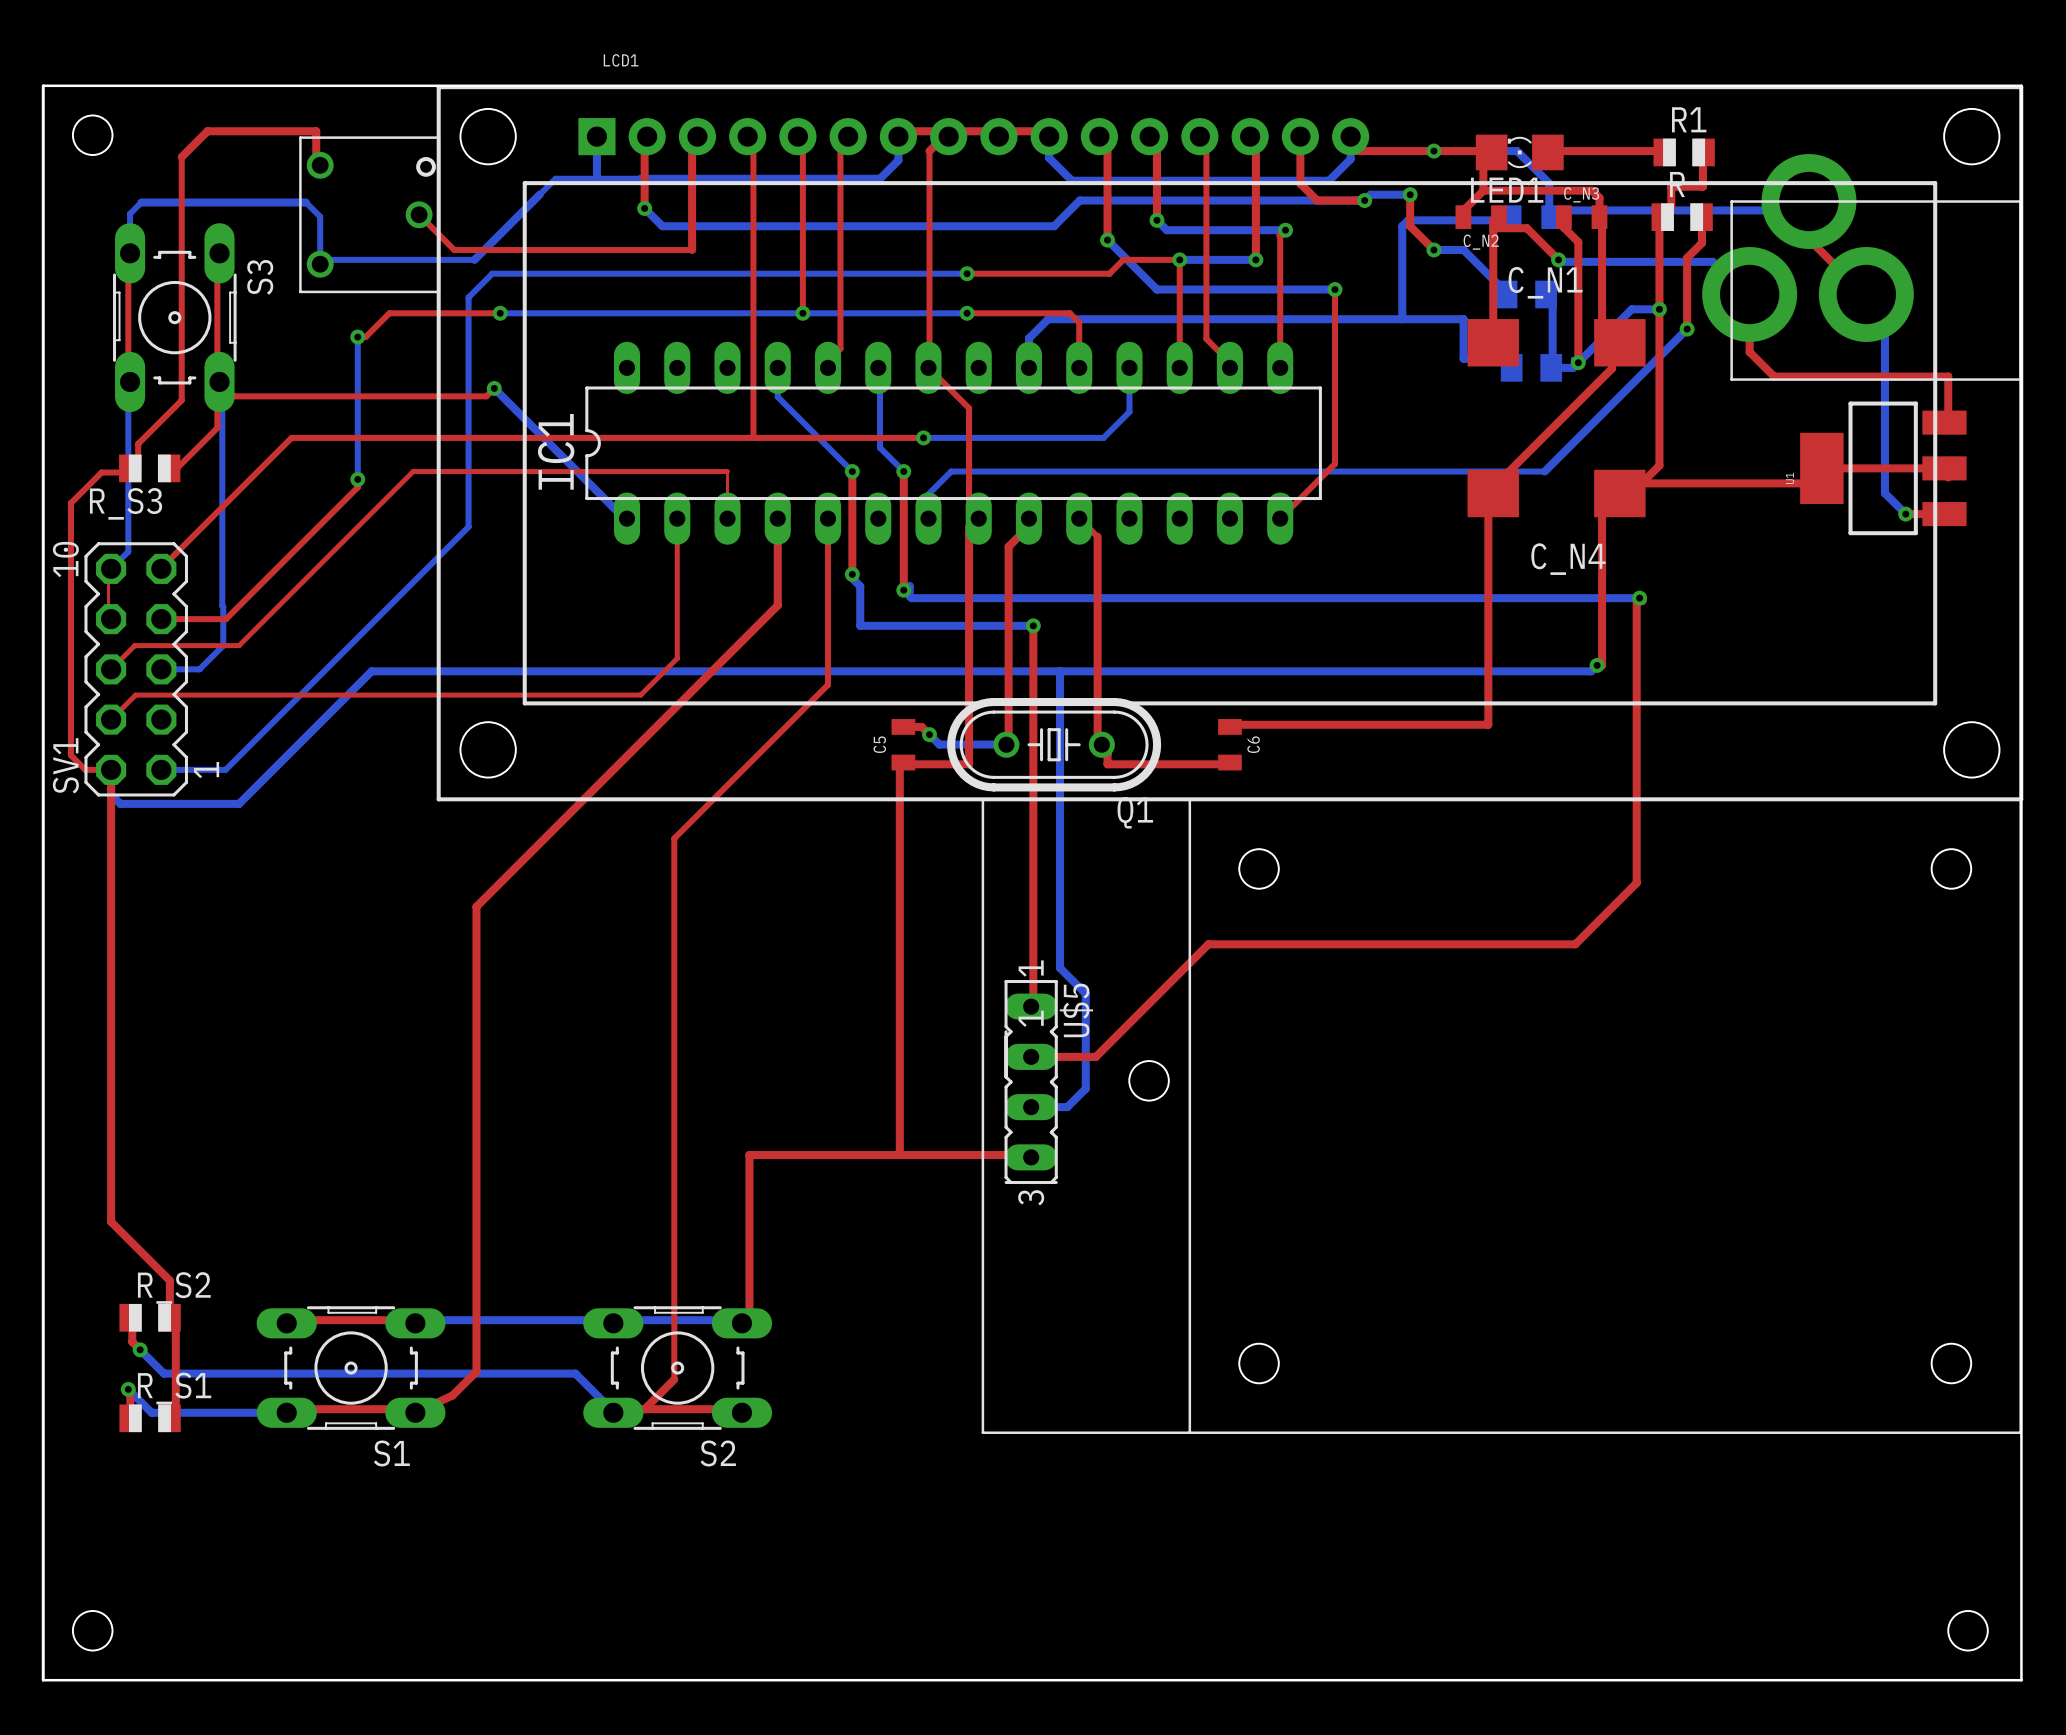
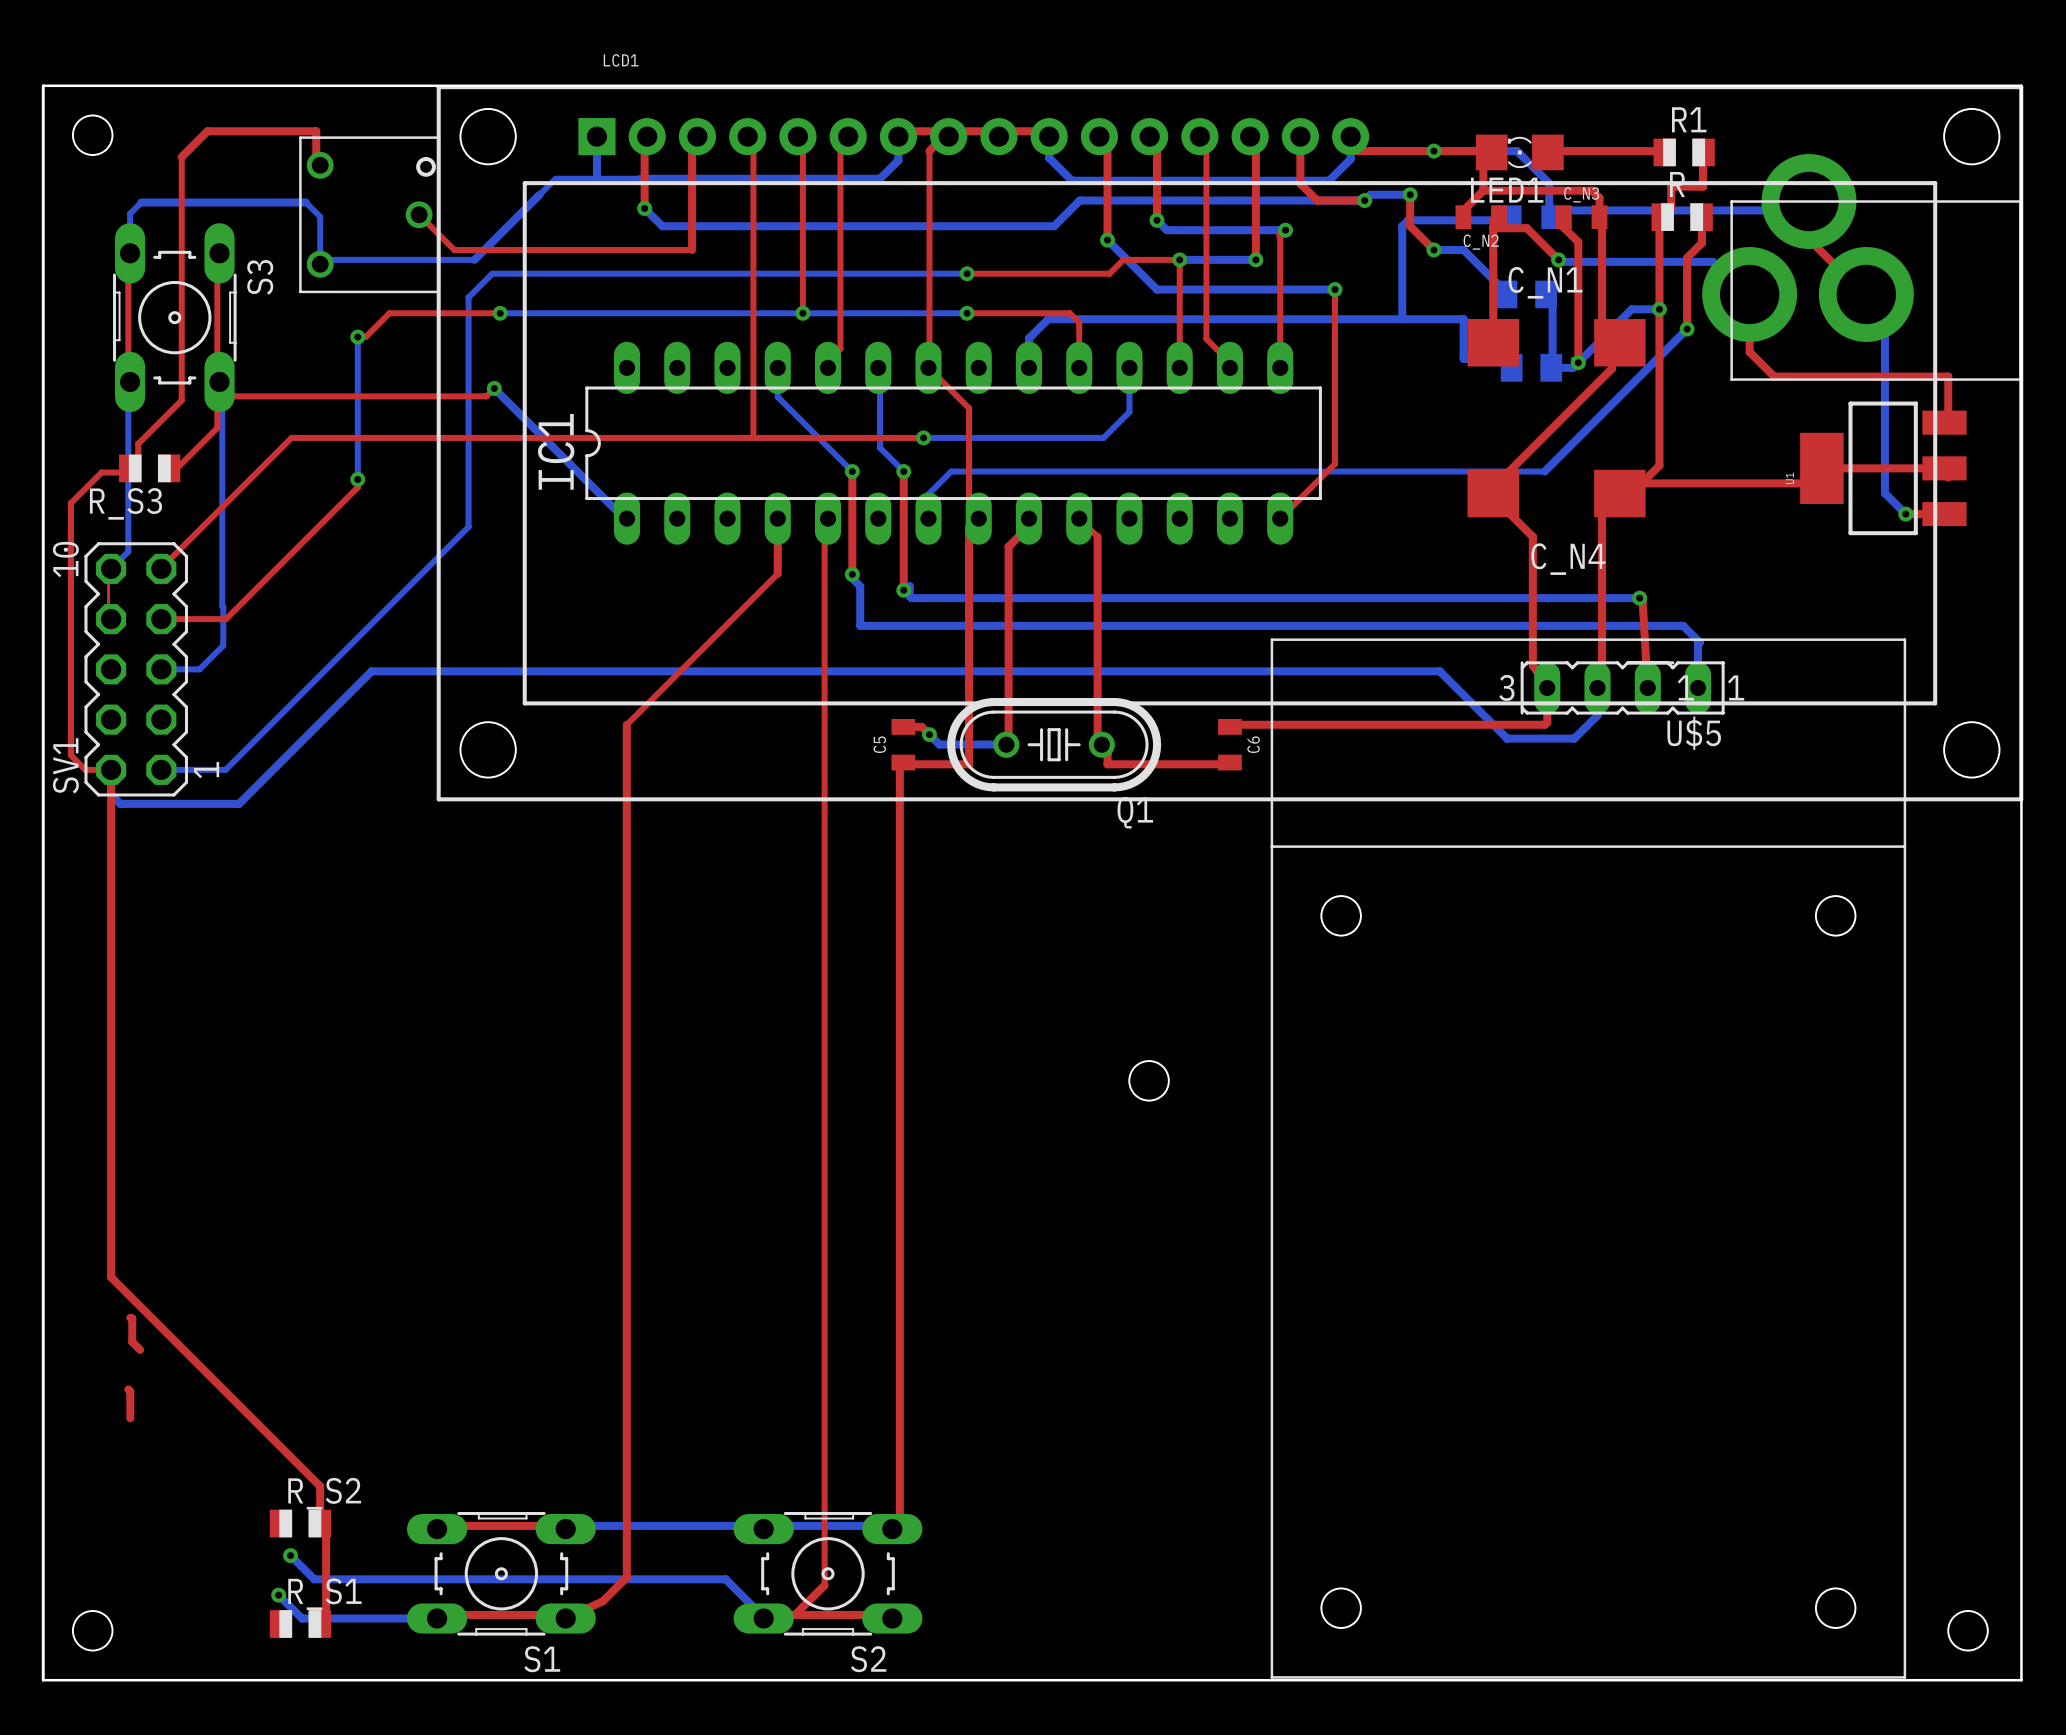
top track: (1493, 497) (1488, 502) (1488, 724) -> (1493, 497) (1532, 536) (1532, 665) (1547, 687) (1547, 722) (1544, 724) (1488, 724)
top track: (727, 518) (727, 471) (413, 471) (239, 645) (134, 645) (111, 669) (113, 665) -> none
top track: (828, 518) (828, 684) (674, 838) (674, 1379) (644, 1409) -> (828, 518) (824, 521) (824, 1585) (794, 1614)
top track: (677, 521) (677, 518) (677, 658) (640, 695) (135, 695) (111, 719) (113, 714) -> none
top track: (777, 573) (777, 605) (476, 906) (476, 1371) (452, 1395) (415, 1412) (413, 1409) (294, 1409) (286, 1412) -> (777, 573) (626, 724) (626, 1577) (602, 1601) (565, 1618) (563, 1614) (444, 1614) (437, 1618)
top track: (1639, 598) (1636, 601) (1636, 883) (1575, 944) (1208, 944) (1095, 1056) (1031, 1056) -> none
top track: none -> (1642, 601) (1647, 687)
top track: (1033, 625) (1033, 1006) (1031, 1006) -> none
bottom track: none -> (1033, 625) (1683, 625) (1699, 642) (1698, 643) (1698, 687)
via: (1033, 625) -> none
bottom track: (1597, 665) (1591, 671) (1439, 671) -> (1597, 687) (1597, 715) (1574, 738) (1507, 738) (1439, 671)
via: (1597, 665) -> none
bottom track: (1060, 671) (1060, 968) (1085, 993) (1085, 1088) (1067, 1107) (1031, 1107) -> none
U$5 rotation: 0° (1501, 1116) -> 90° clockwise (1588, 1158)
top track: none -> (899, 1155) (899, 1525) (892, 1529)
top track: (1031, 1157) (1028, 1155) (749, 1155) (749, 1320) (741, 1323) -> none
top track: (111, 1221) (169, 1280) (169, 1317) -> (111, 1221) (111, 1277) (320, 1486) (320, 1523)
R_S2 position: (150, 1317) -> (300, 1523)
top track: (169, 1317) (175, 1320) (175, 1409) (169, 1418) -> (320, 1523) (326, 1525) (326, 1614) (320, 1624)
top track: (286, 1323) (294, 1320) (413, 1320) (415, 1323) -> (437, 1529) (444, 1525) (563, 1525) (565, 1529)
bottom track: (415, 1323) (423, 1320) (610, 1320) (613, 1323) (620, 1320) (739, 1320) (741, 1323) -> (565, 1529) (573, 1525) (761, 1525) (763, 1529) (771, 1525) (889, 1525) (892, 1529)
bottom track: (140, 1349) (163, 1373) (575, 1373) (613, 1412) -> (290, 1555) (314, 1579) (725, 1579) (763, 1618)
via: (140, 1349) -> none
S1 position: (351, 1368) -> (501, 1573)
S2 position: (677, 1368) -> (828, 1573)
bottom track: (128, 1389) (151, 1412) (286, 1412) -> (278, 1595) (302, 1618) (437, 1618)
via: (128, 1389) -> none
top track: (613, 1412) (620, 1409) (739, 1409) (741, 1412) -> (763, 1618) (771, 1614) (889, 1614) (892, 1618)
R_S1 position: (150, 1418) -> (300, 1624)
via: none -> (290, 1555)
via: none -> (278, 1595)

